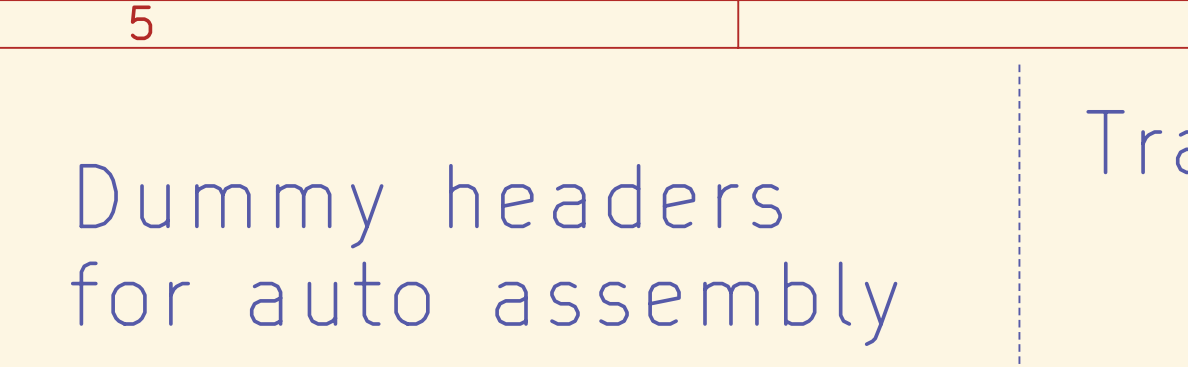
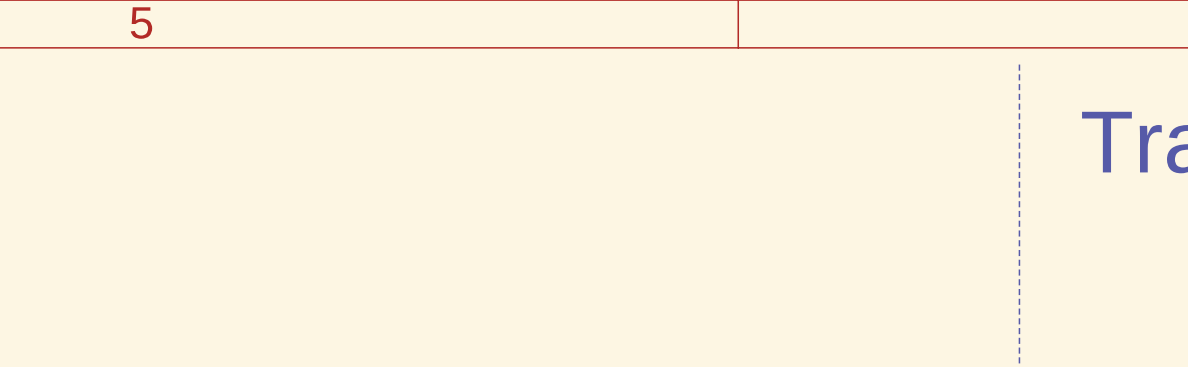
text: Dummy headers (430, 206) -> none
text: for auto assembly (484, 303) -> none

